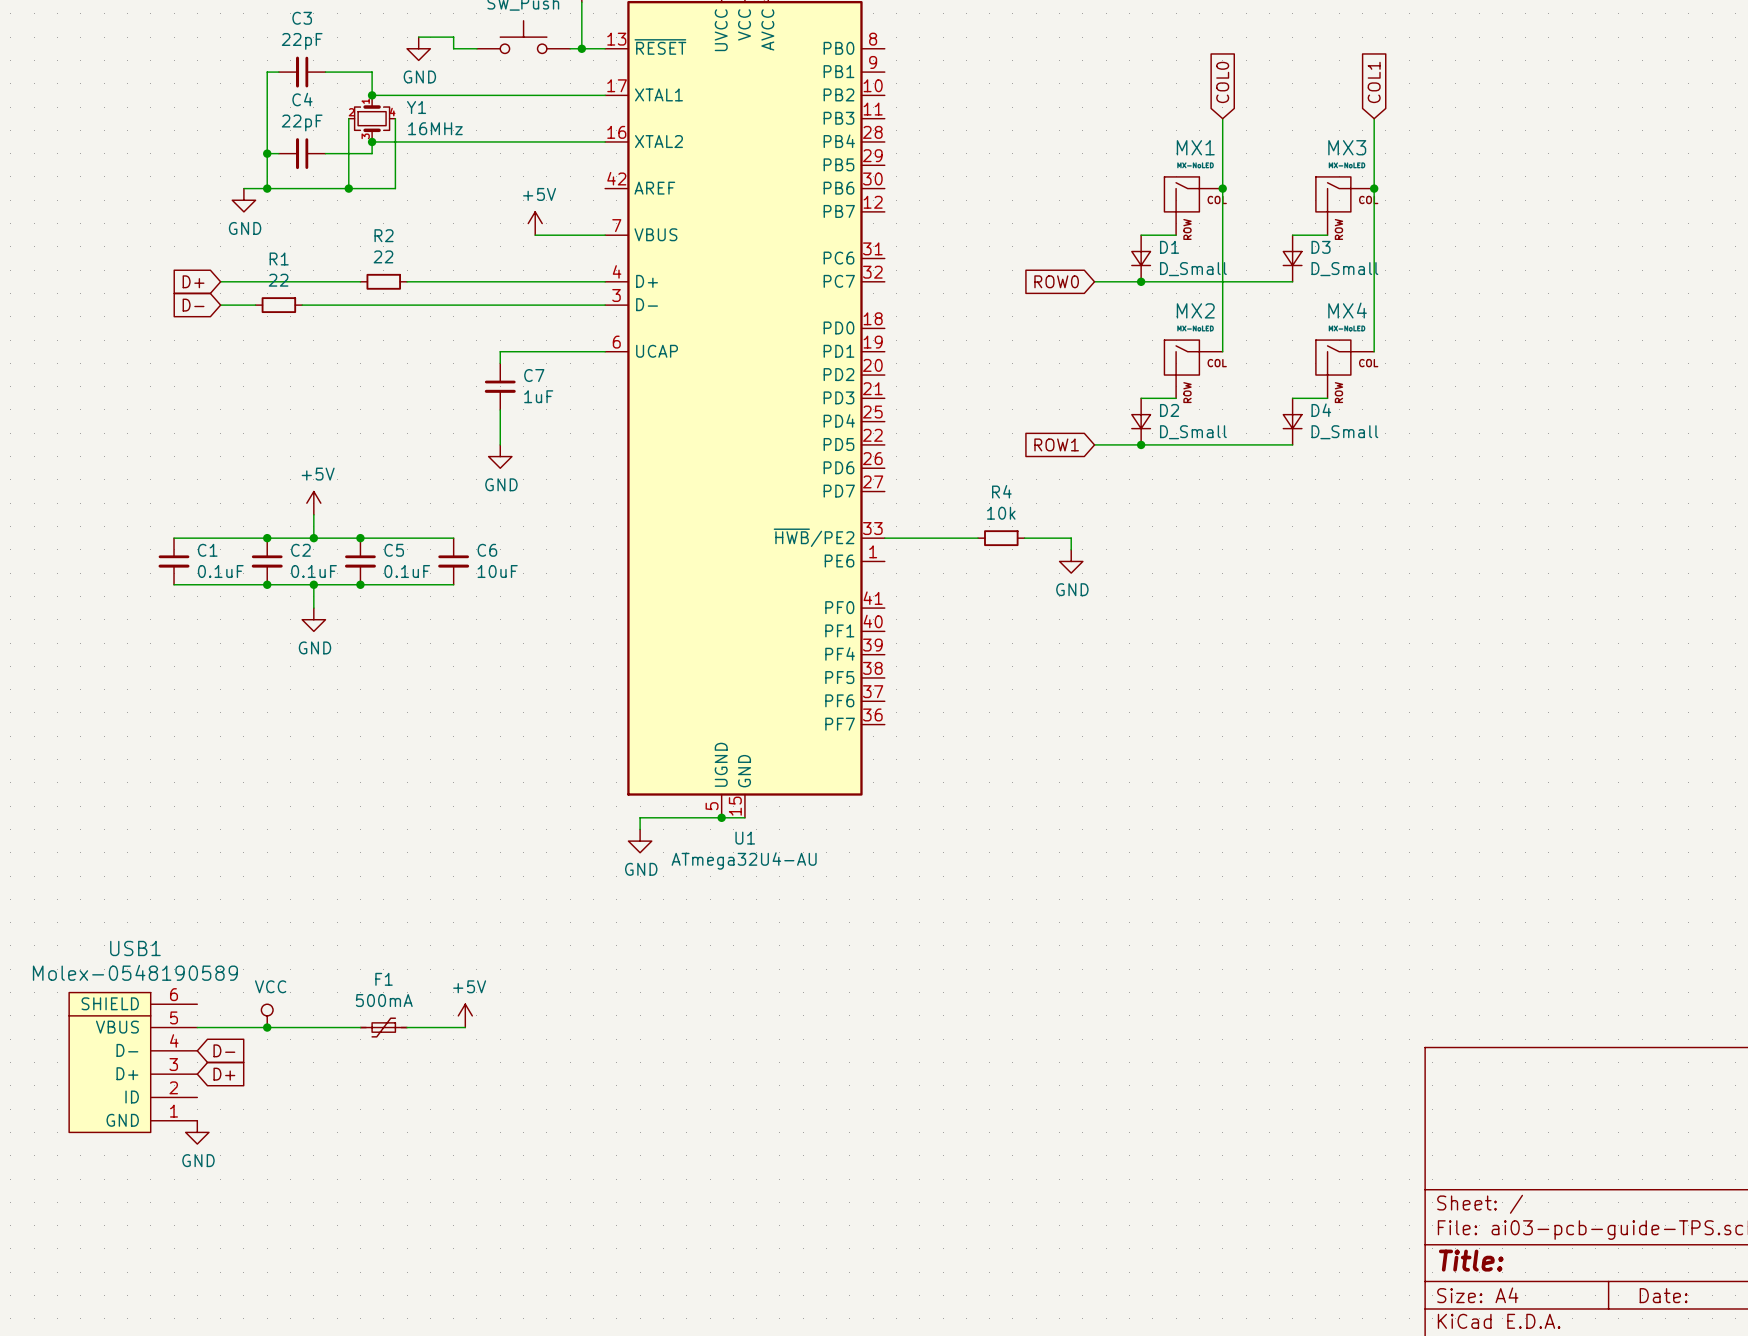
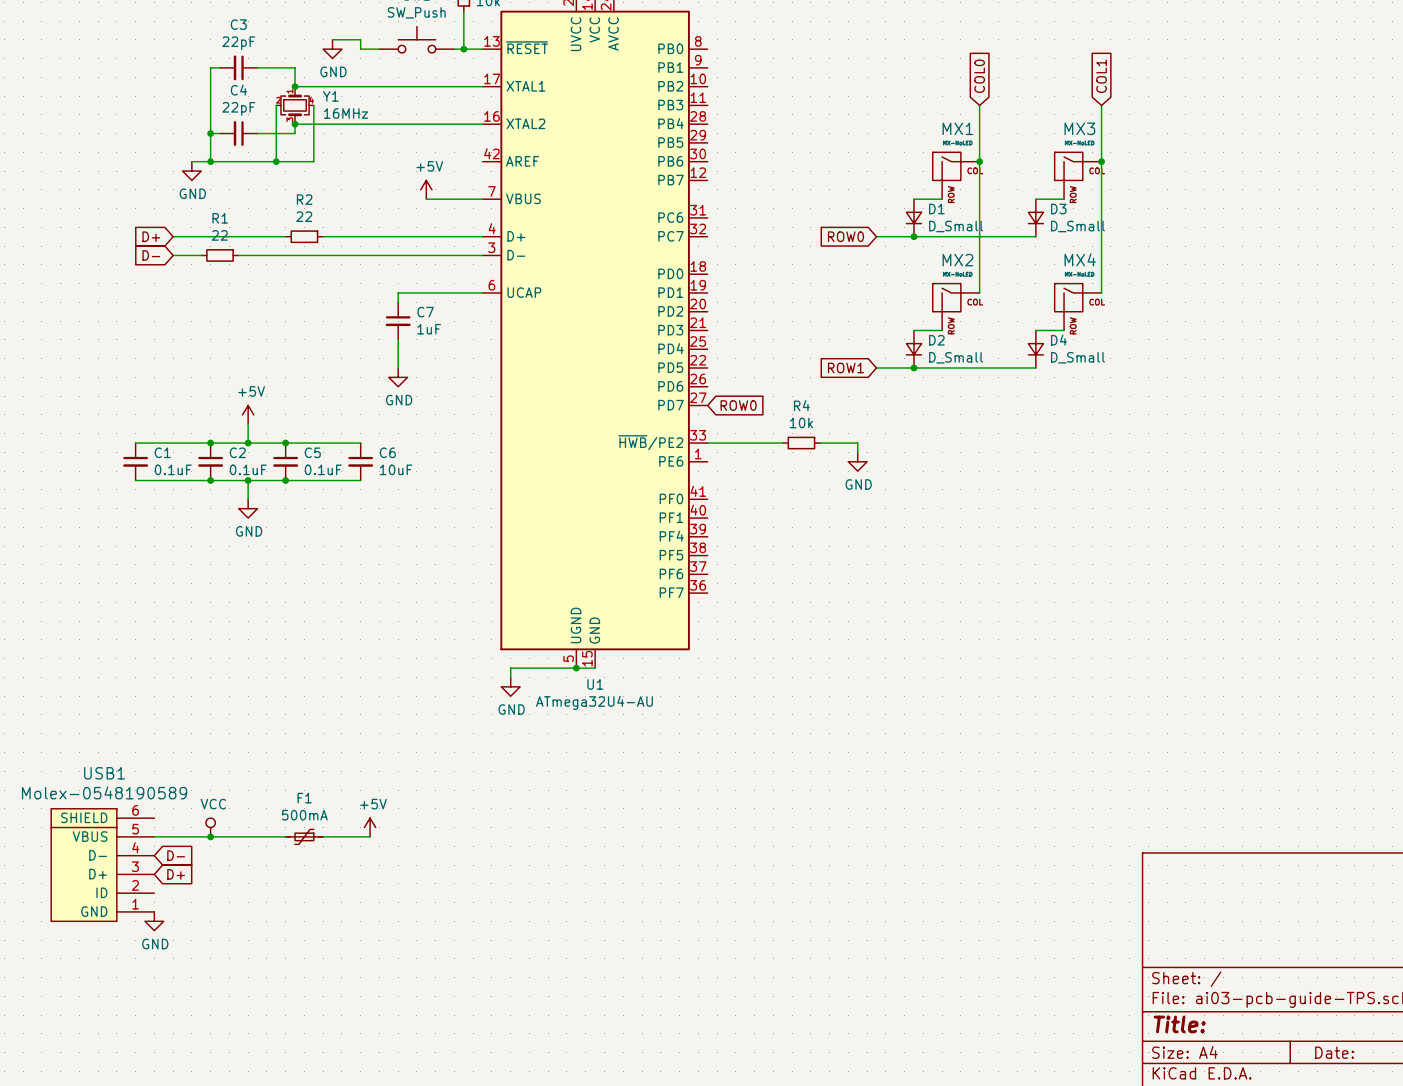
global label: none -> ROW0 (738, 405)

